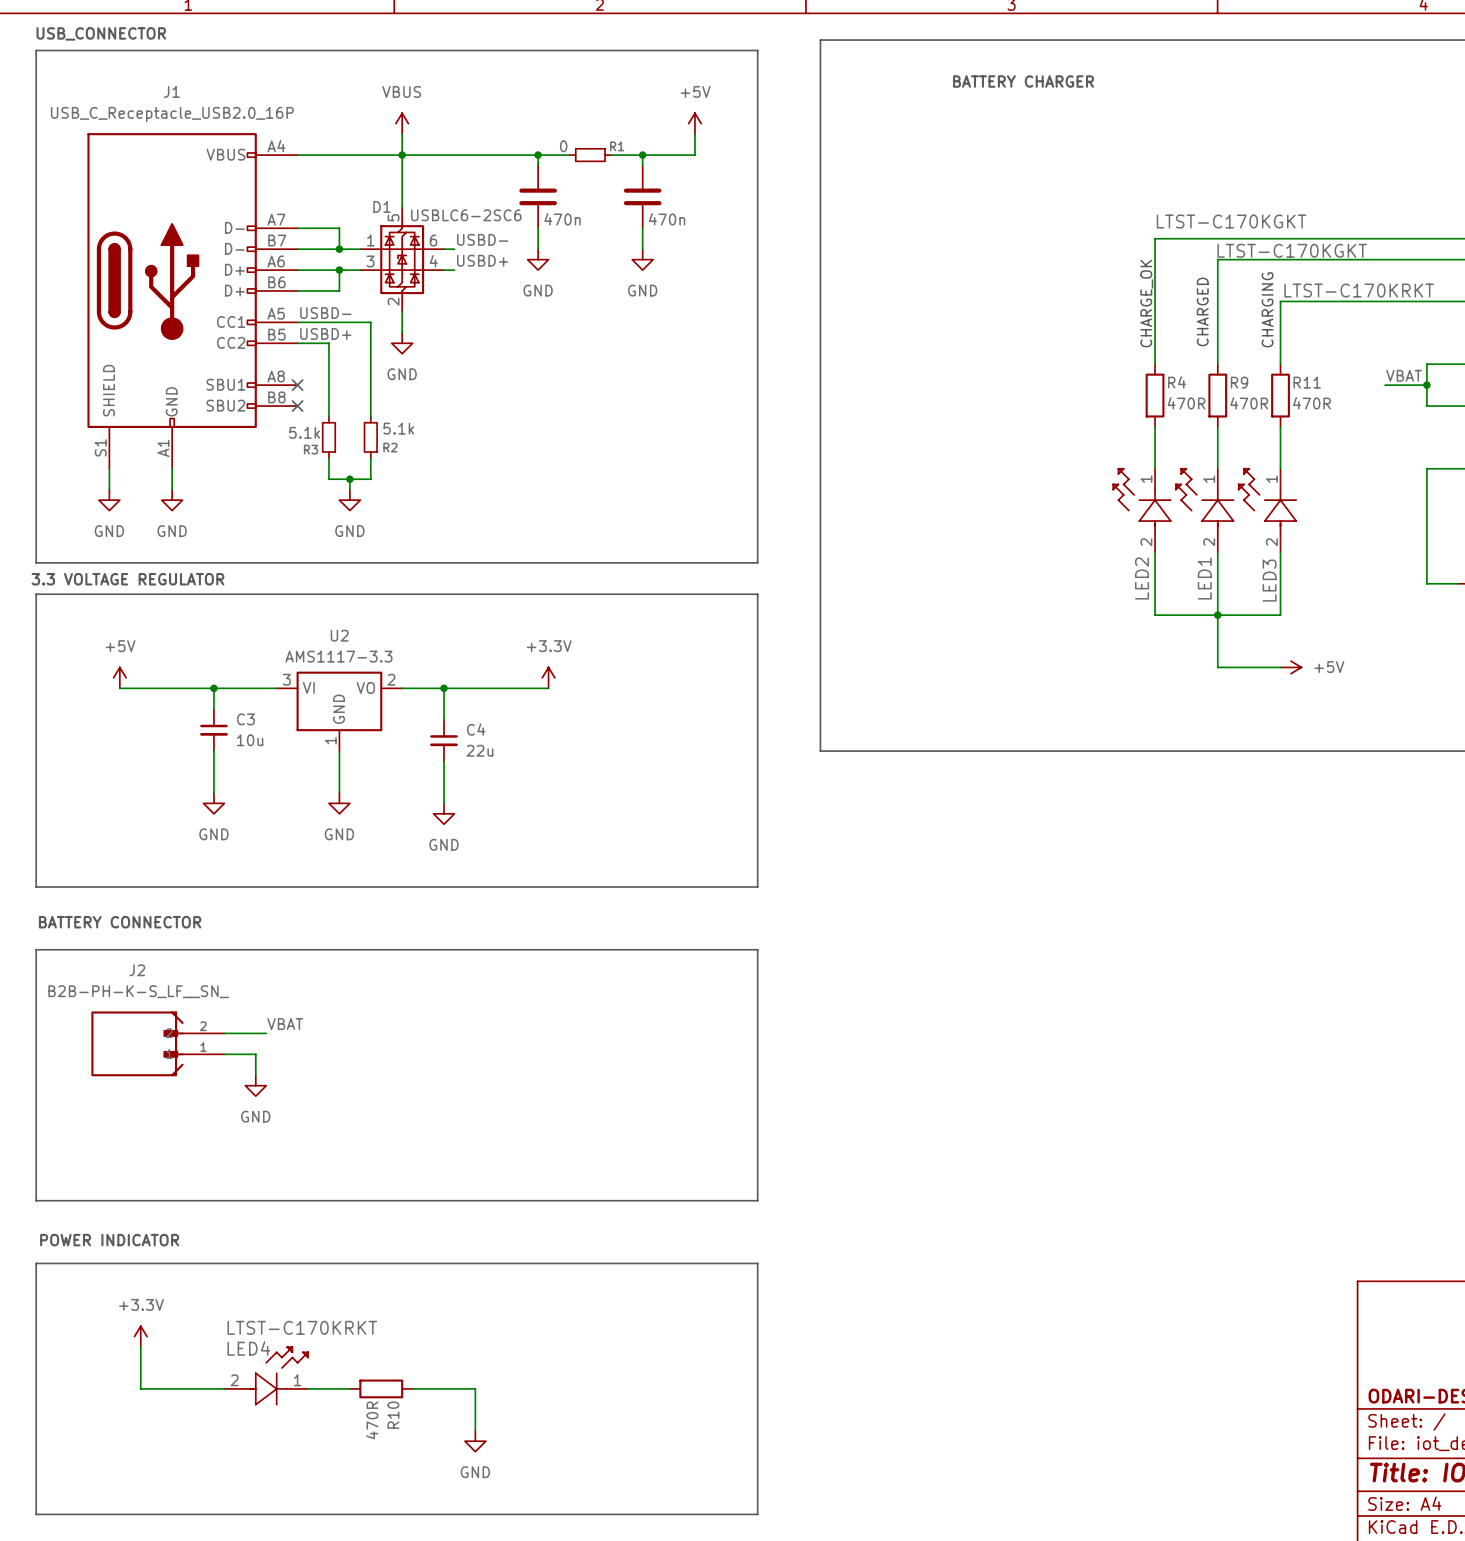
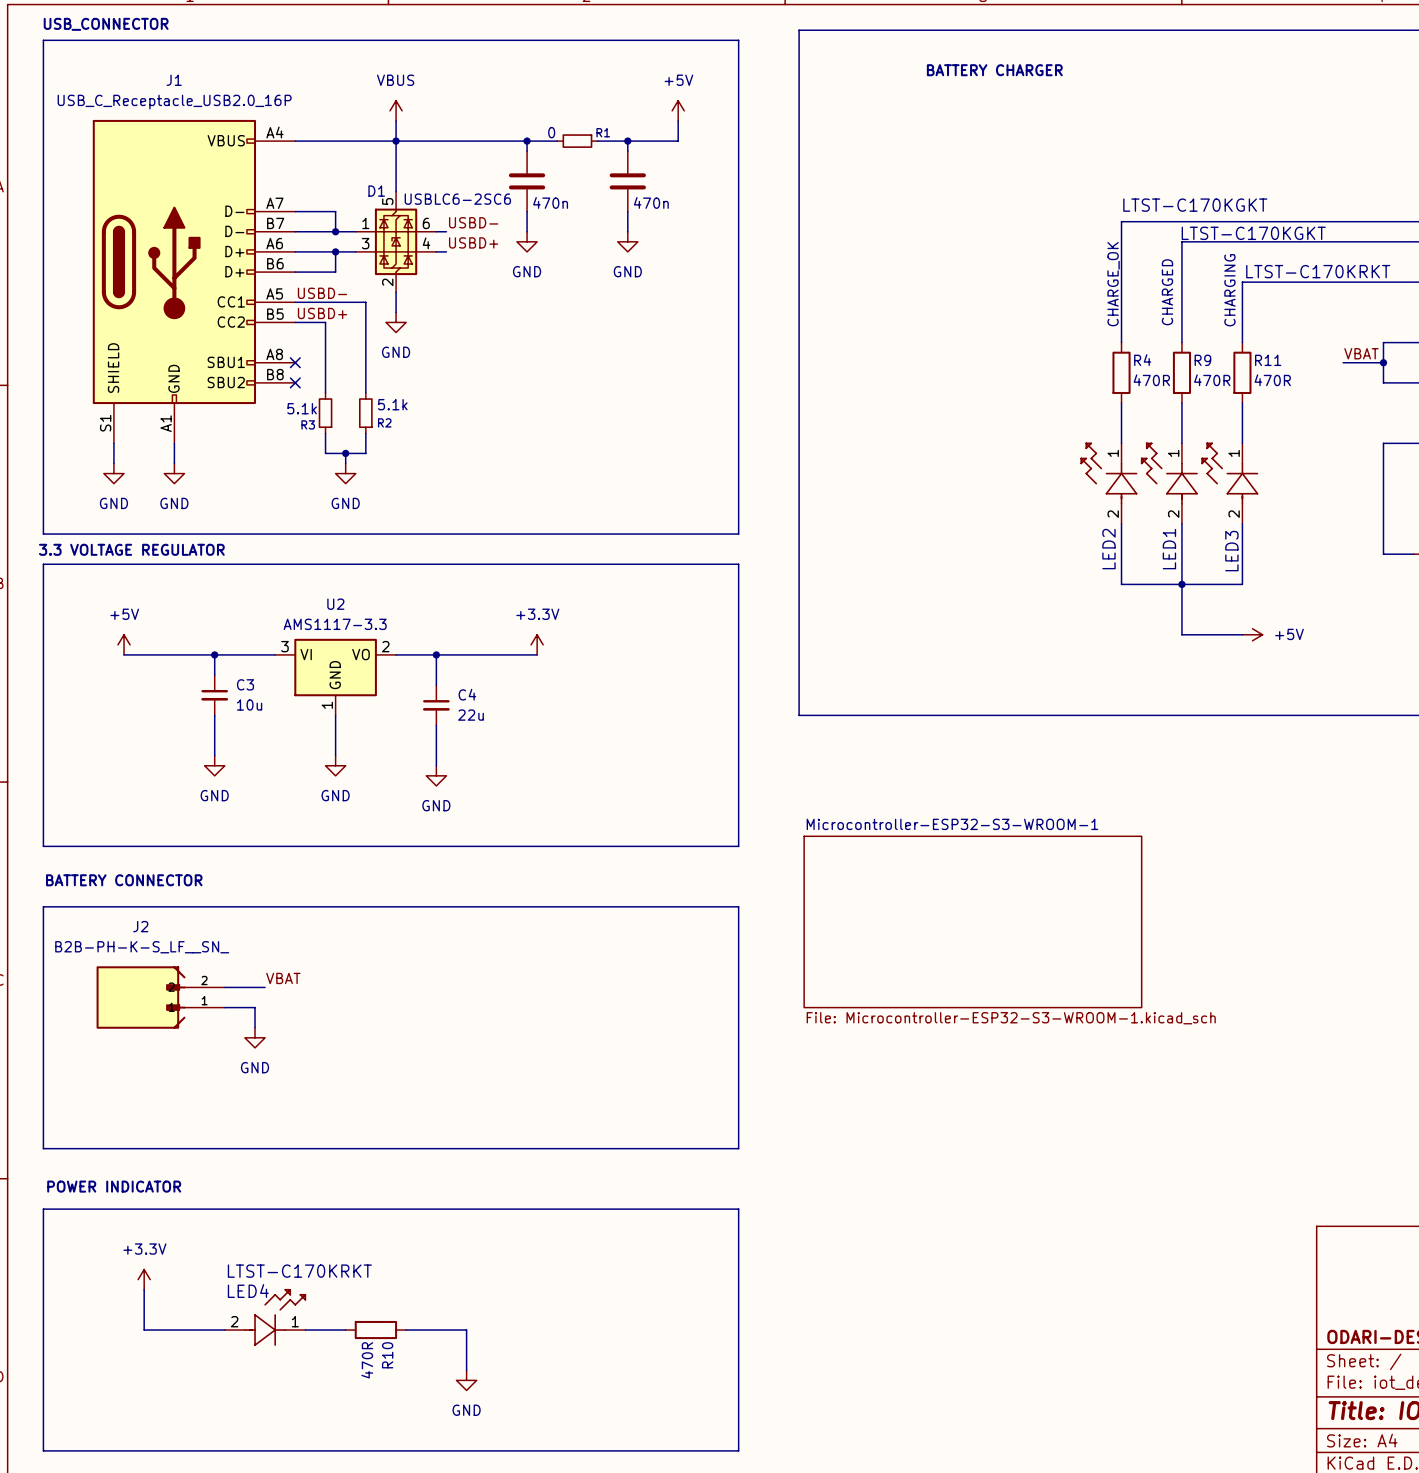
sheet Microcontroller-ESP32-S3-WROOM-1: none -> File: Microcontroller-ESP32-S3-WROOM-1.kicad_sch (972, 921)

